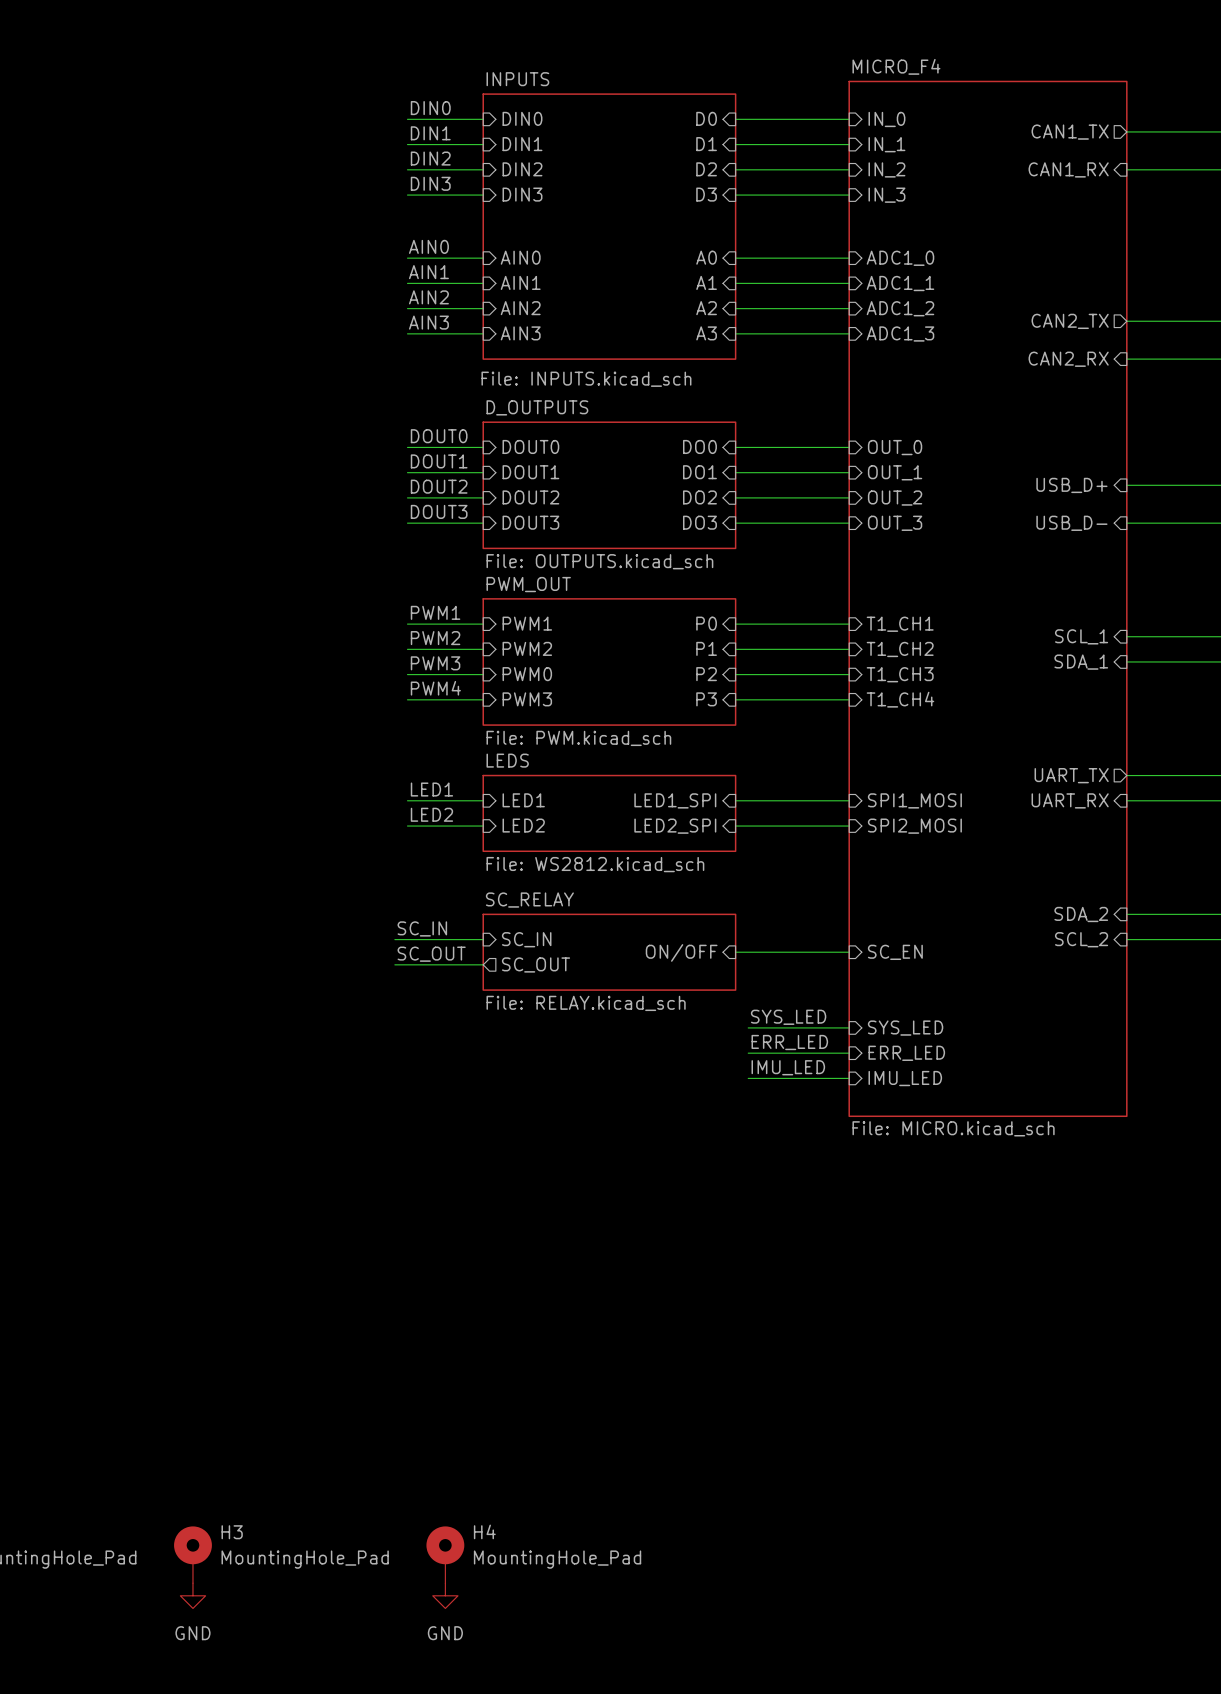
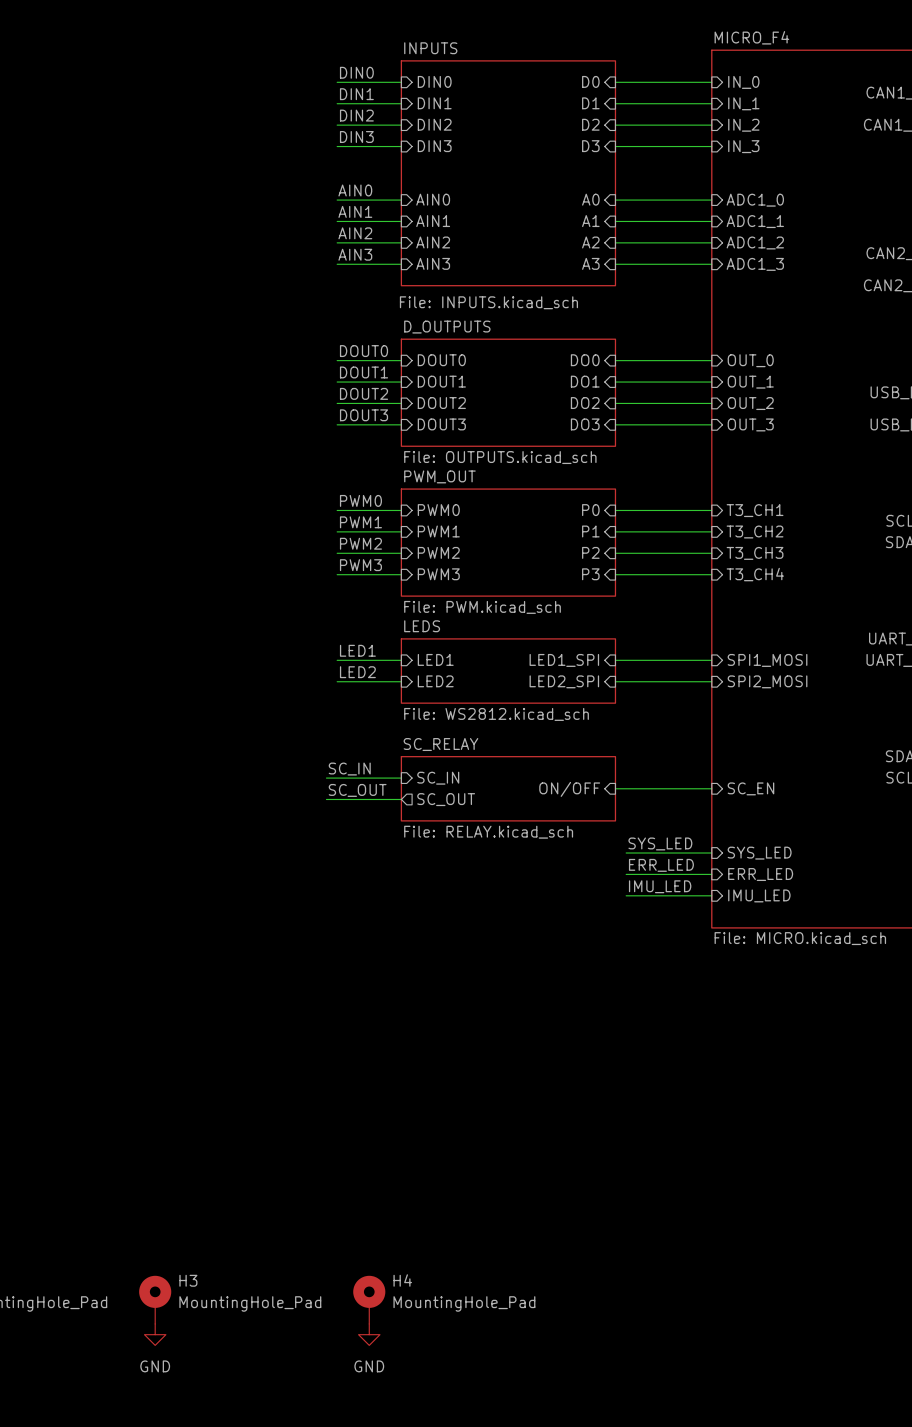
label: PWM1 (435, 612) -> PWM0 (360, 500)
sheet pin: PWM1 (527, 623) -> PWM0 (438, 510)
sheet pin: T1_CH1 (900, 624) -> T3_CH1 (755, 510)
label: PWM2 (435, 638) -> PWM1 (360, 522)
sheet pin: PWM2 (527, 648) -> PWM1 (438, 531)
sheet pin: T1_CH2 (900, 649) -> T3_CH2 (755, 531)
label: PWM3 (435, 663) -> PWM2 (360, 543)
sheet pin: PWM0 (527, 674) -> PWM2 (438, 552)
sheet pin: T1_CH3 (900, 674) -> T3_CH3 (755, 553)
label: PWM4 (435, 688) -> PWM3 (360, 565)
sheet pin: T1_CH4 (900, 699) -> T3_CH4 (755, 574)

